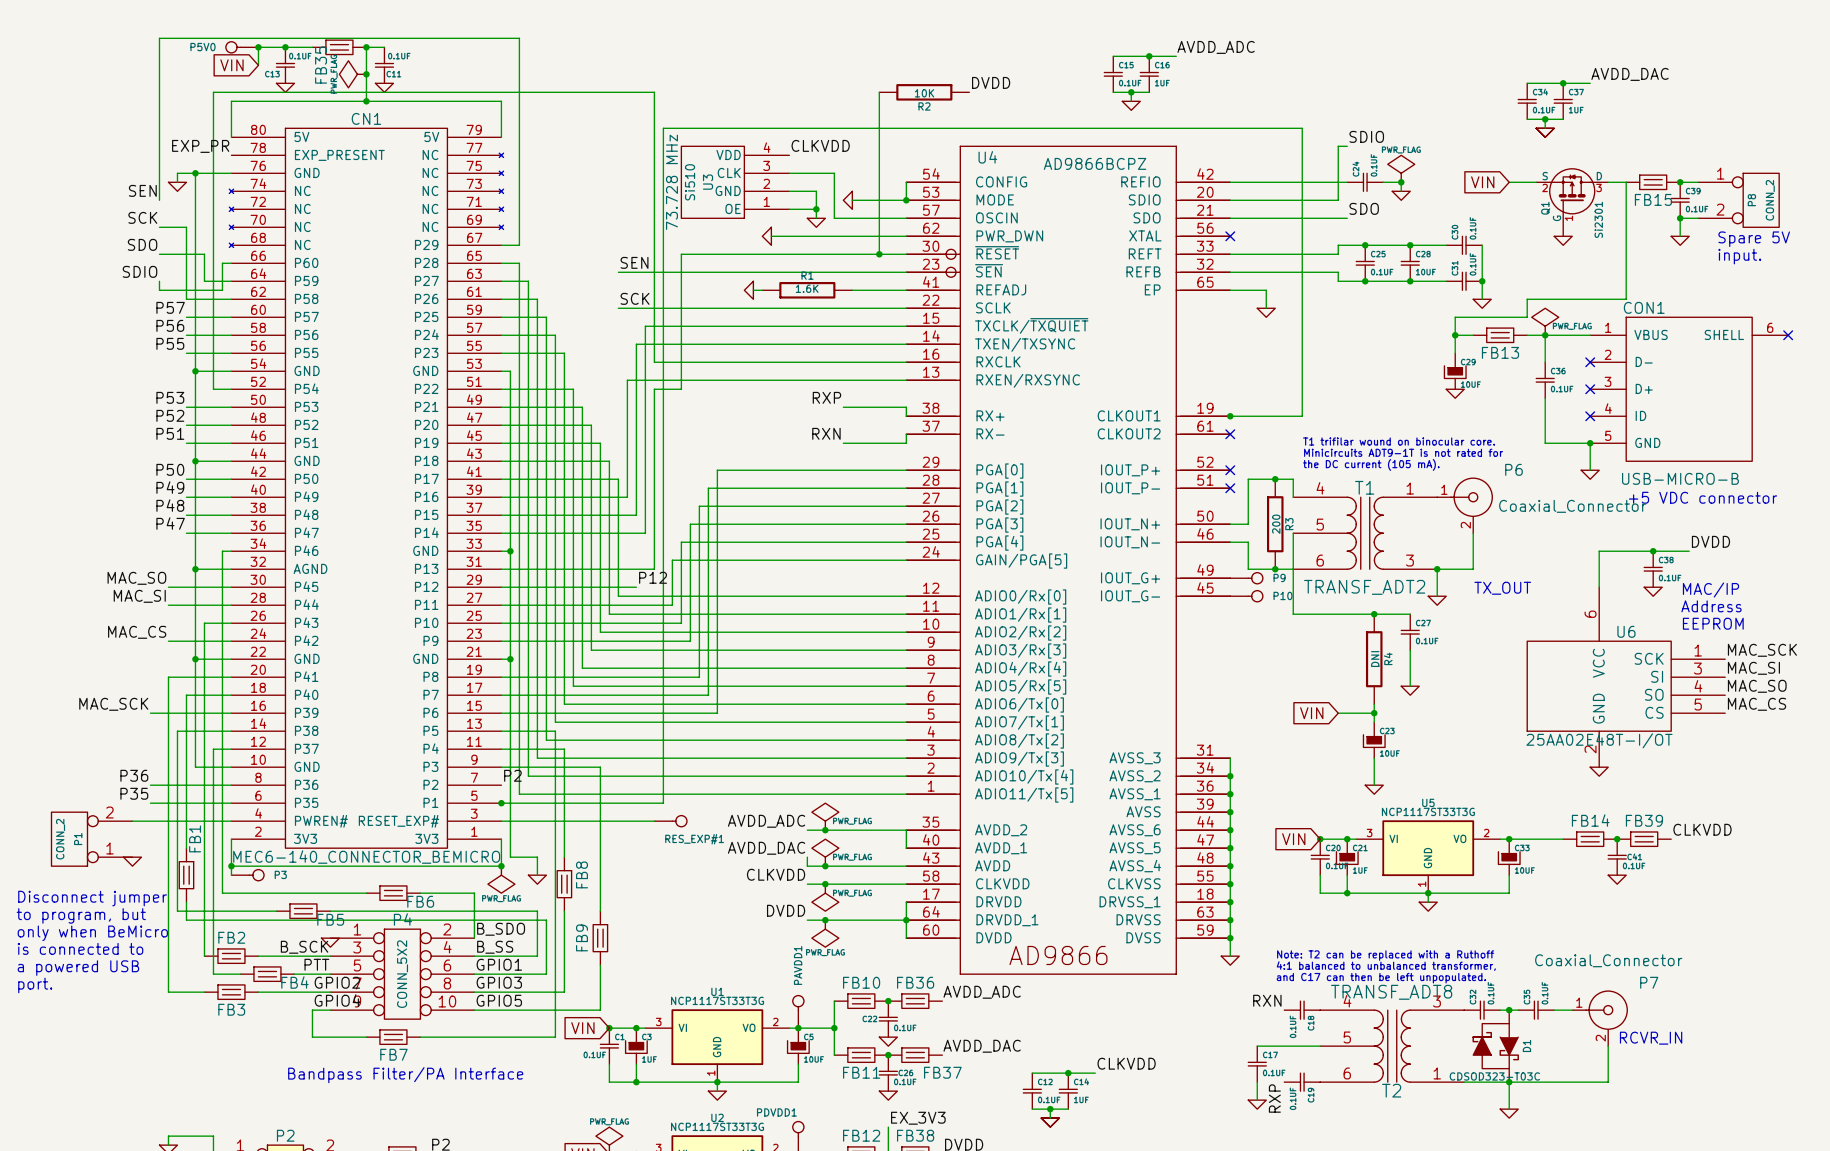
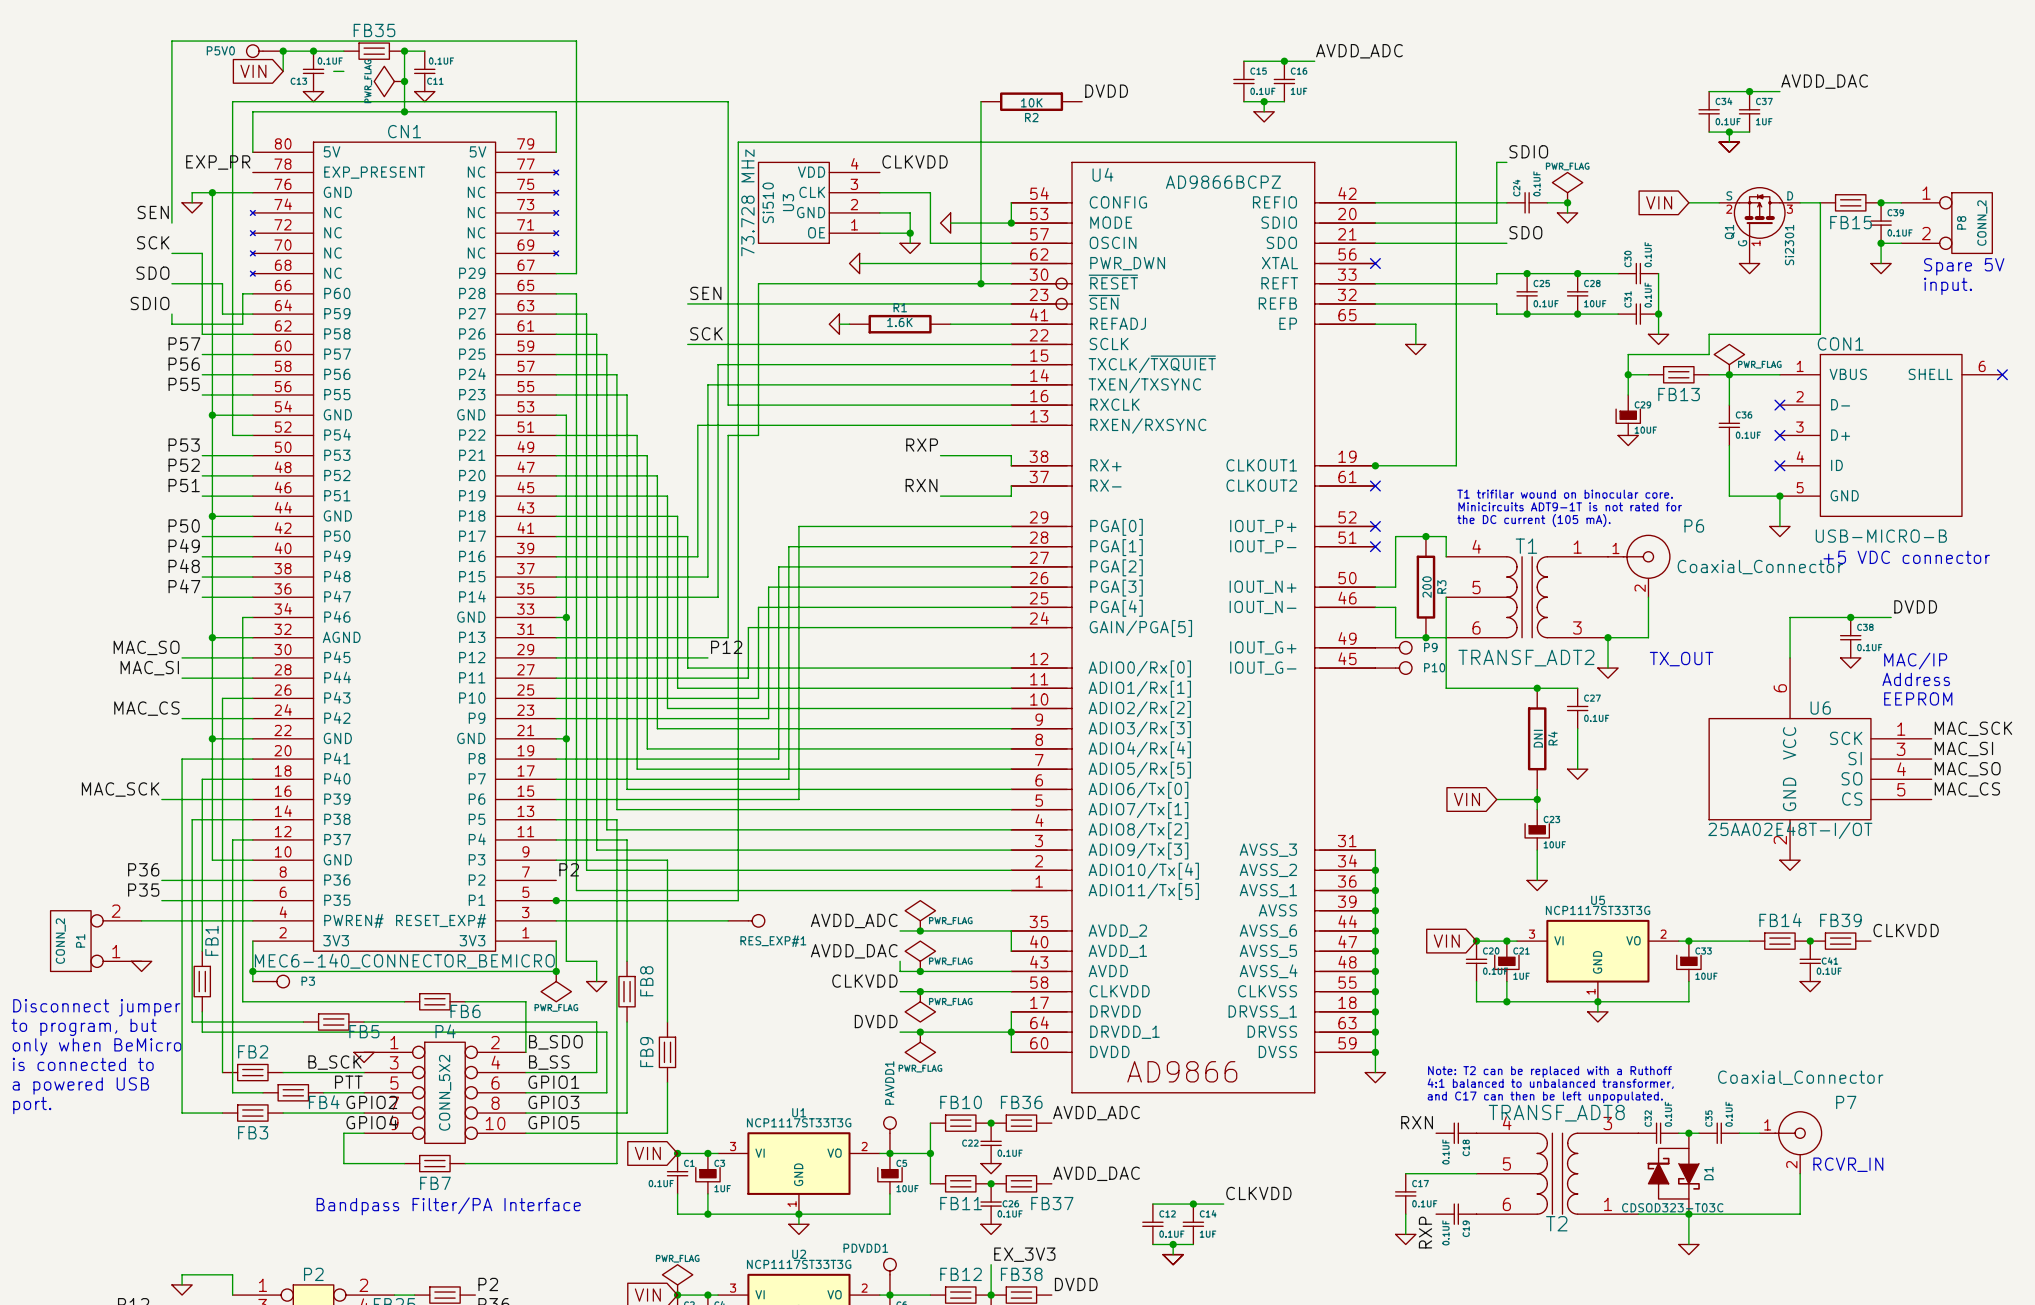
wire: none -> (333, 71) (343, 71)
FB35 name rotation: 0° (321, 65) -> 90° clockwise (374, 30)

